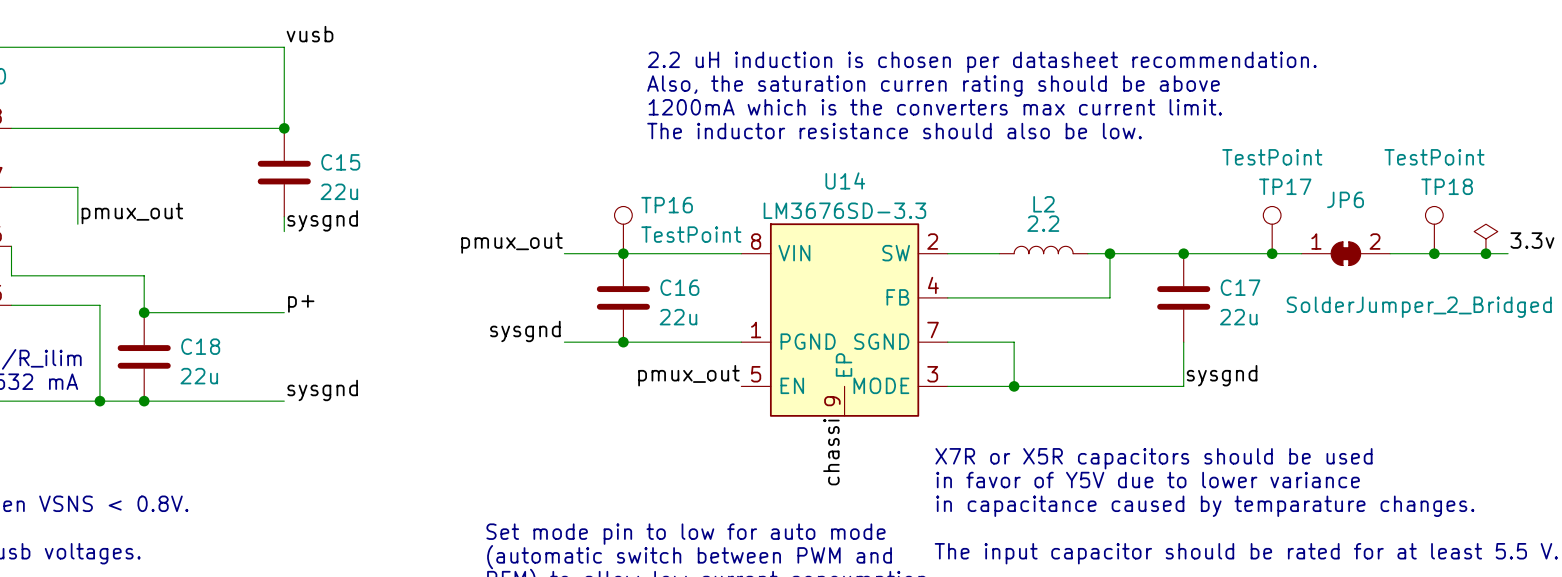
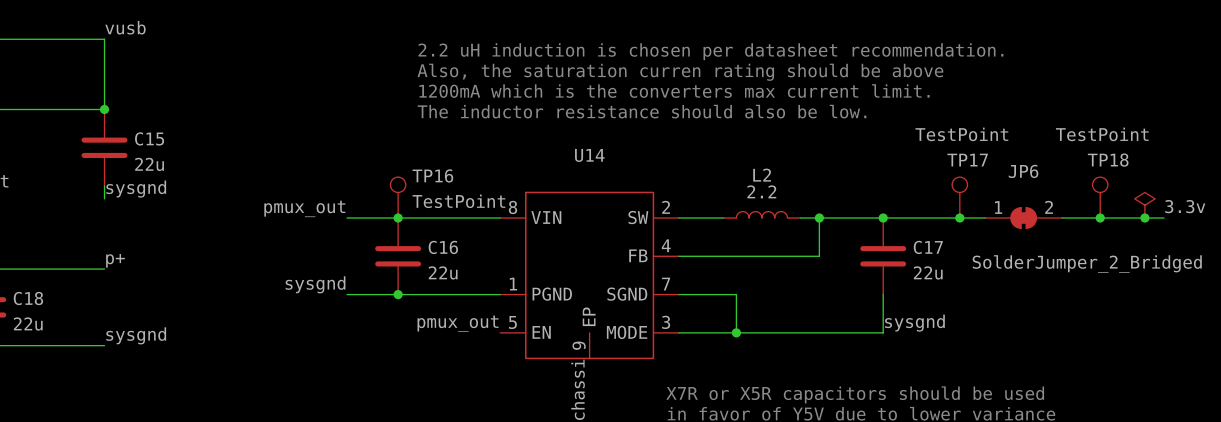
U14 value: LM3676SD-3.3 (844, 210) -> none

